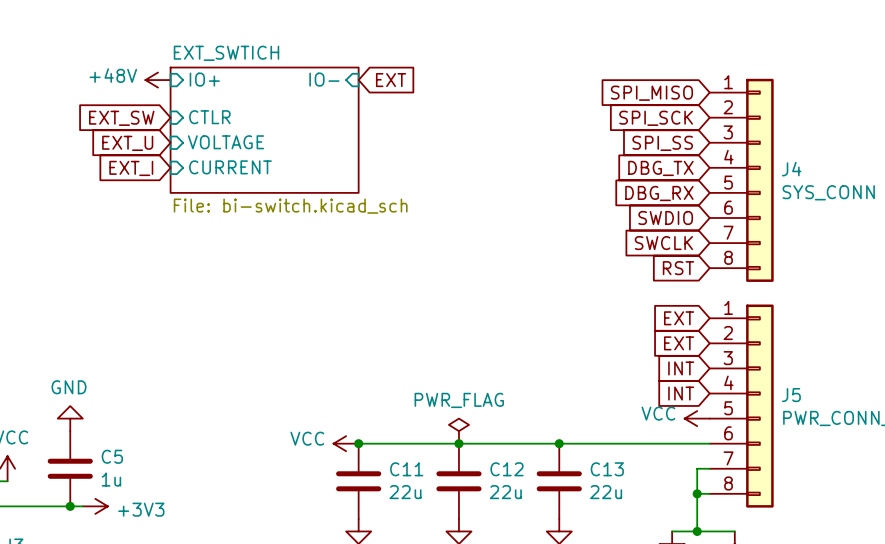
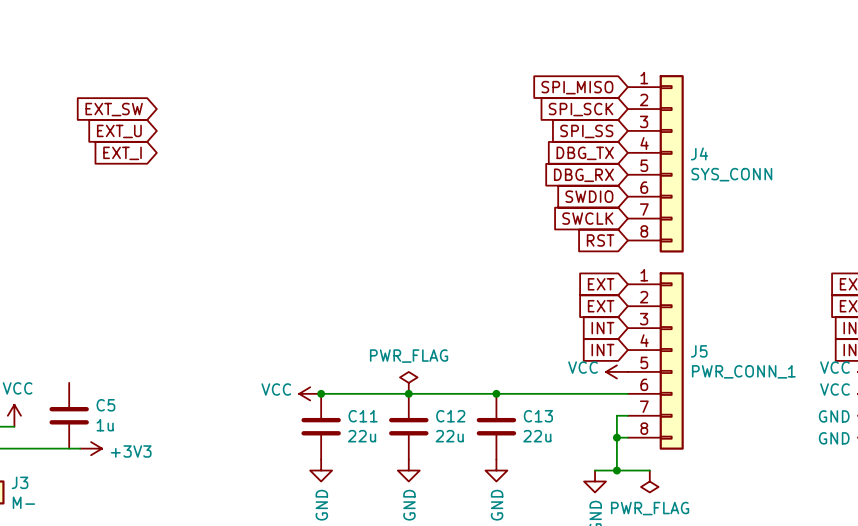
sheet pin: IO+ (204, 79) -> none
sheet pin: IO- (324, 79) -> none
power symbol: +48V (158, 80) -> none
global label: EXT (391, 80) -> none
sheet pin: CTLR (209, 117) -> none
sheet EXT_SWTICH: File: bi-switch.kicad_sch (264, 130) -> none
sheet pin: VOLTAGE (226, 142) -> none
sheet pin: CURRENT (230, 167) -> none
power symbol: GND (70, 418) -> none
junction: (70, 506) -> none

